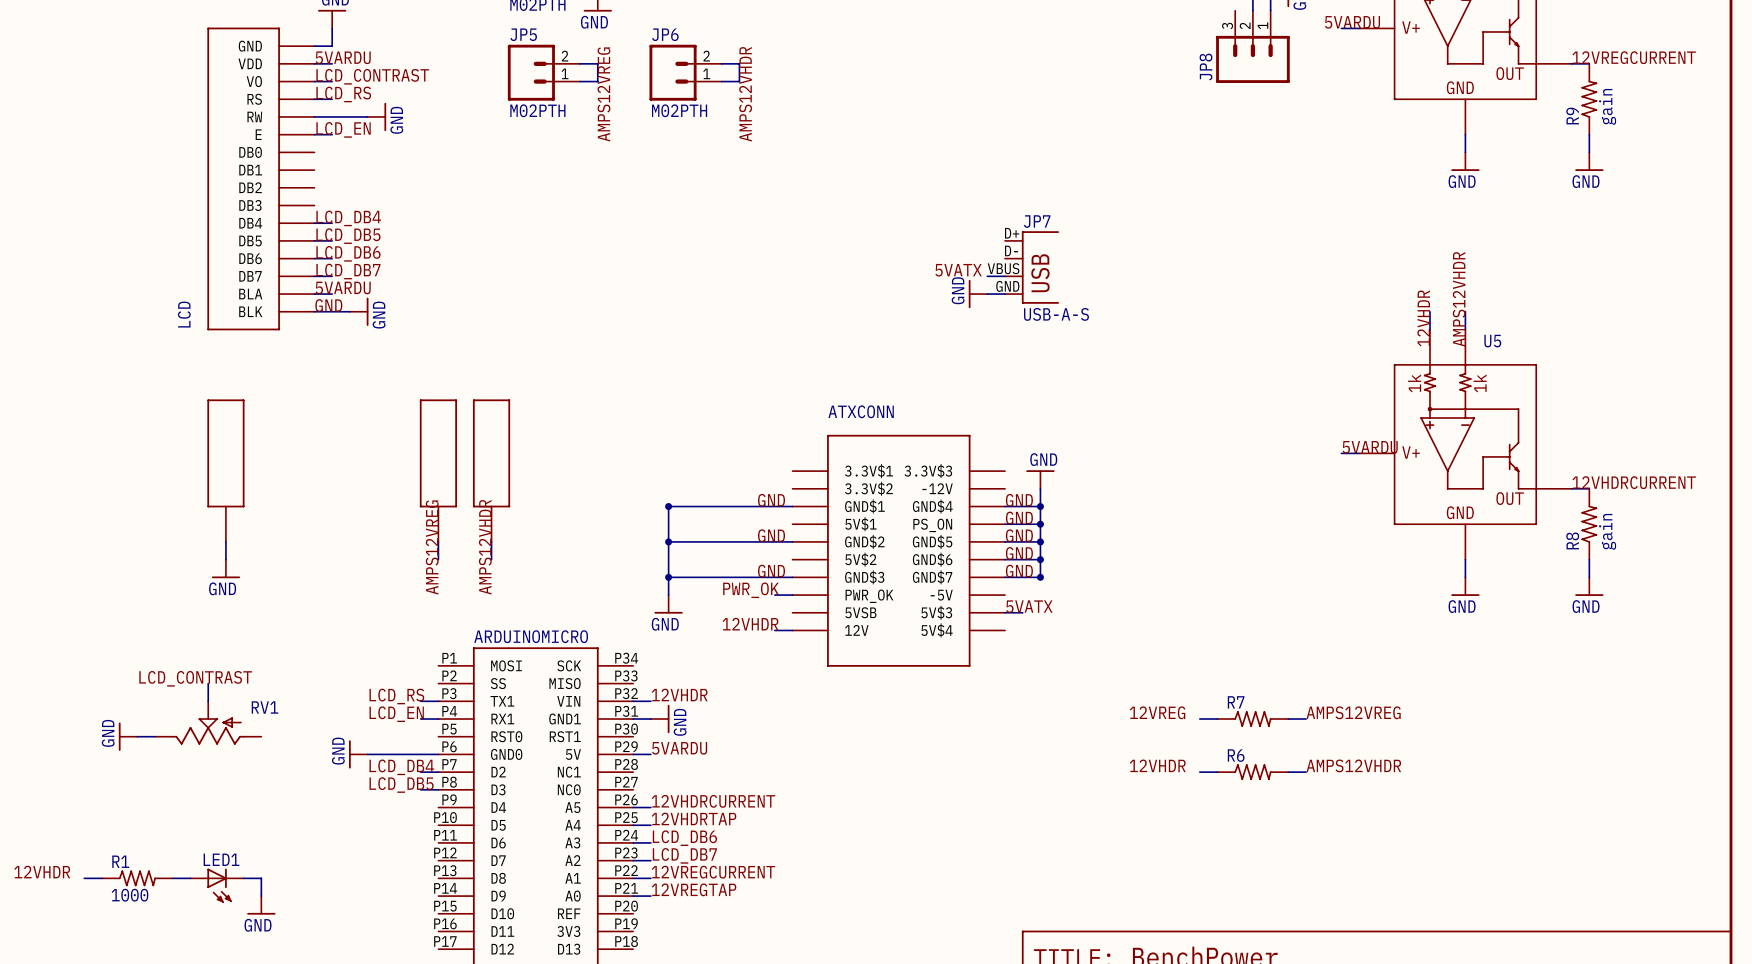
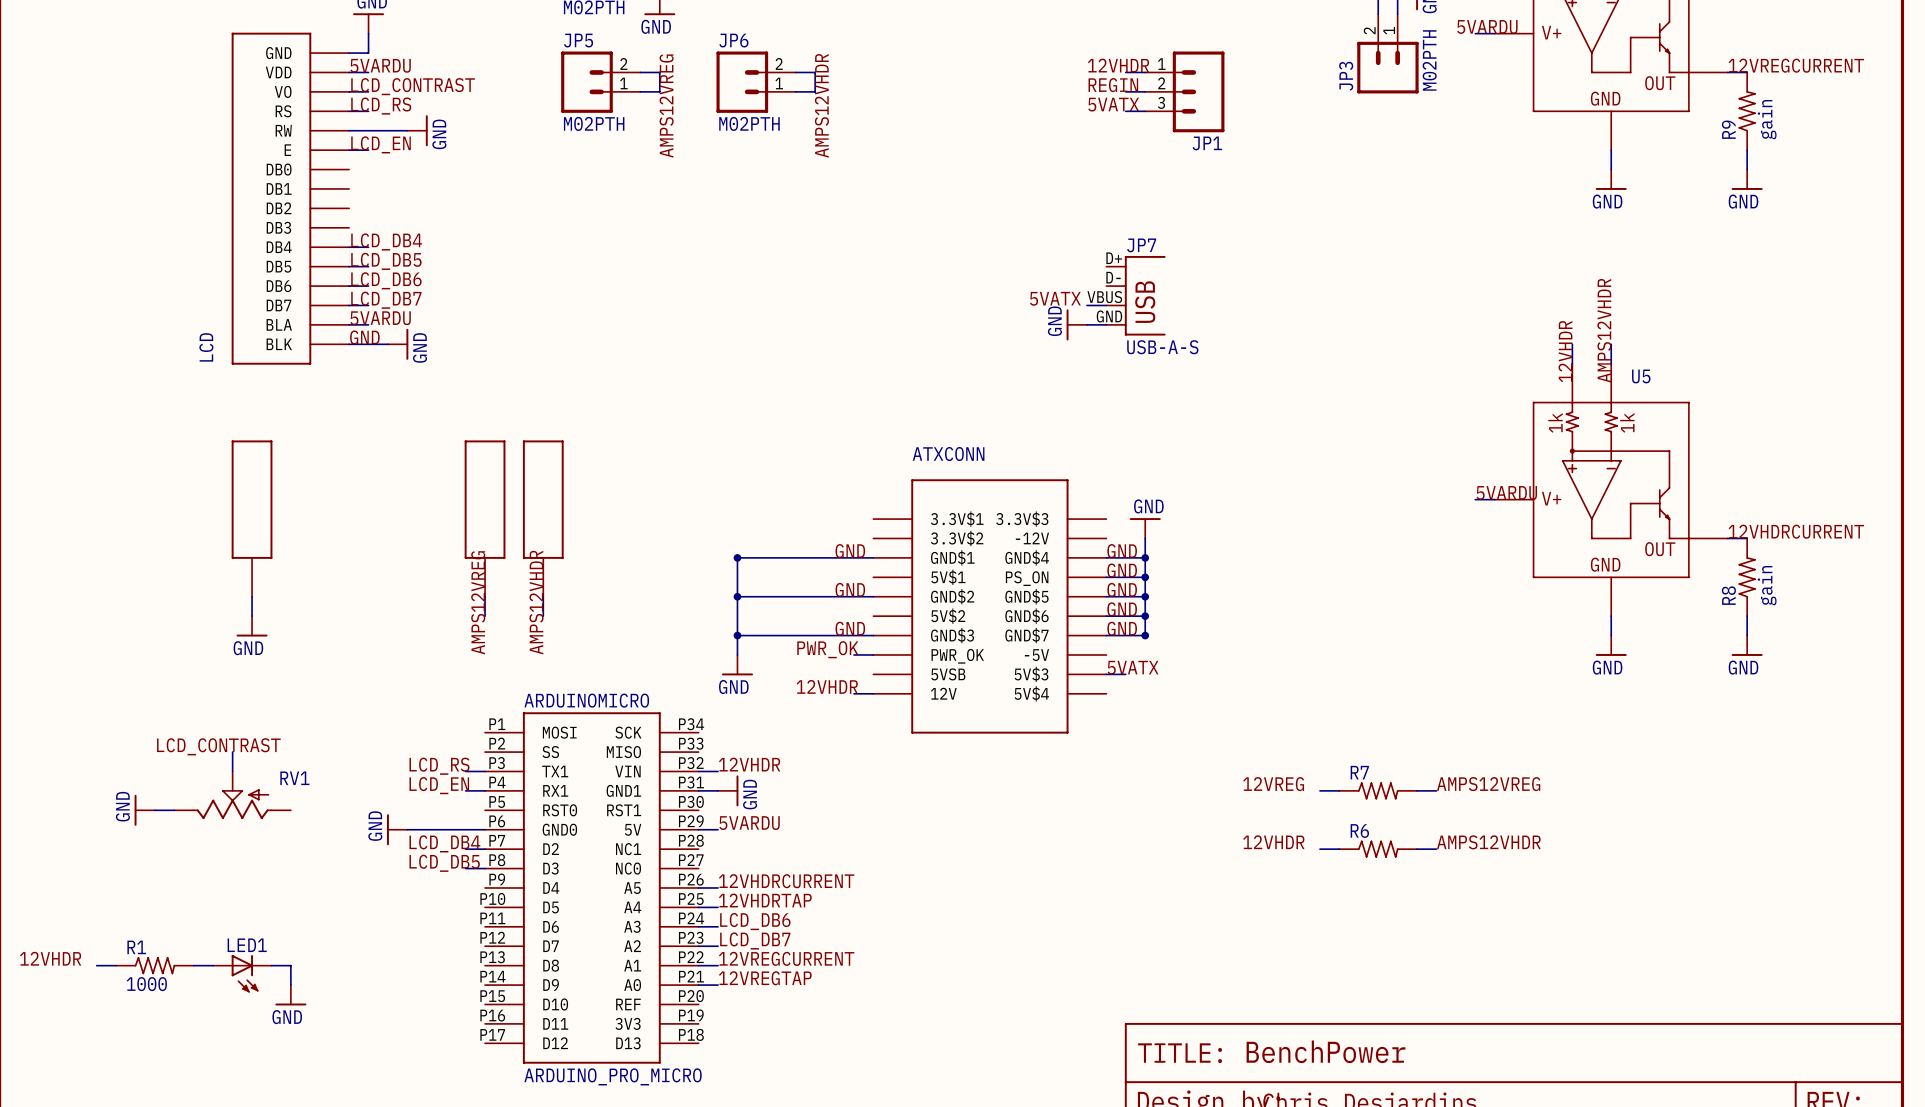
JP8: (1252, 46) -> none
JP3: none -> M02PTH (1387, 53)
label: none -> 12VHDR (1118, 65)
wire: none -> (1125, 72) (1145, 72)
label: none -> REGIN (1113, 85)
wire: none -> (1125, 91) (1145, 91)
JP1: none -> (1184, 91)
label: none -> 5VATX (1113, 104)
wire: none -> (1125, 111) (1145, 111)

